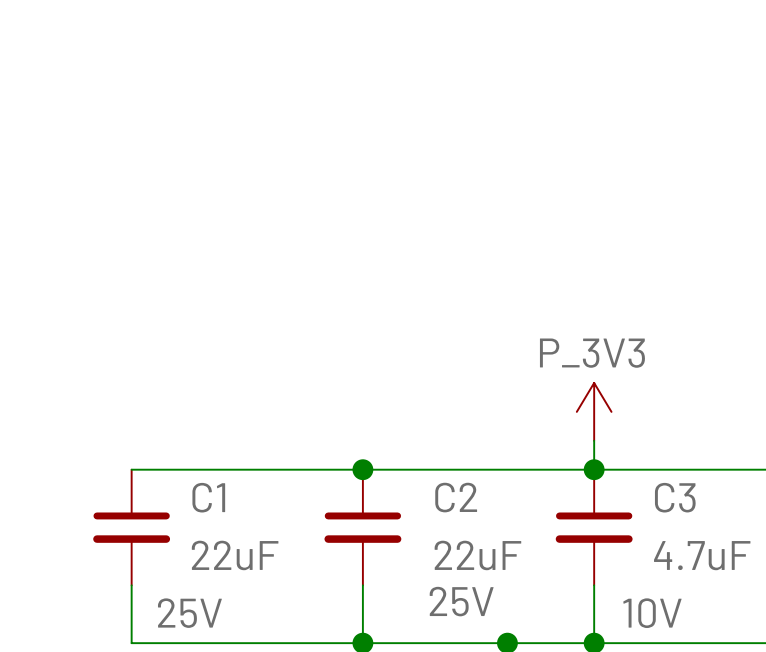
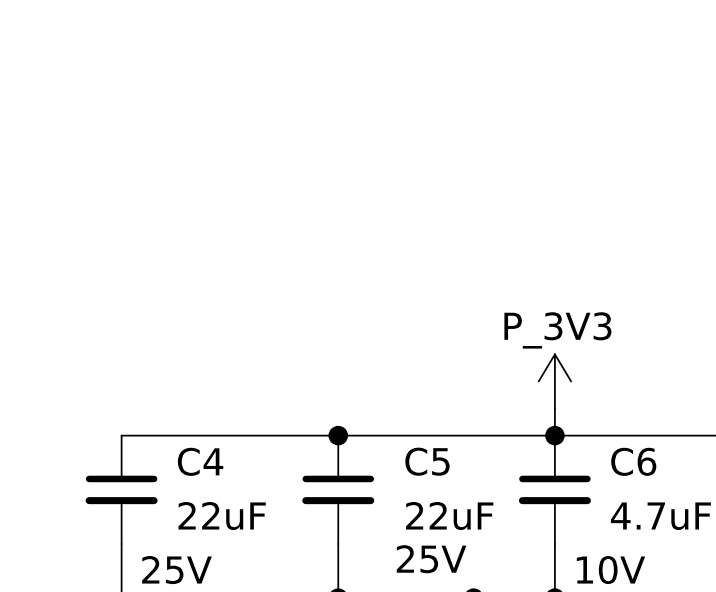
C1 name: C1 (208, 497) -> C4 (200, 461)
C2 name: C2 (456, 497) -> C5 (427, 461)
C3 name: C3 (675, 497) -> C6 (633, 461)

